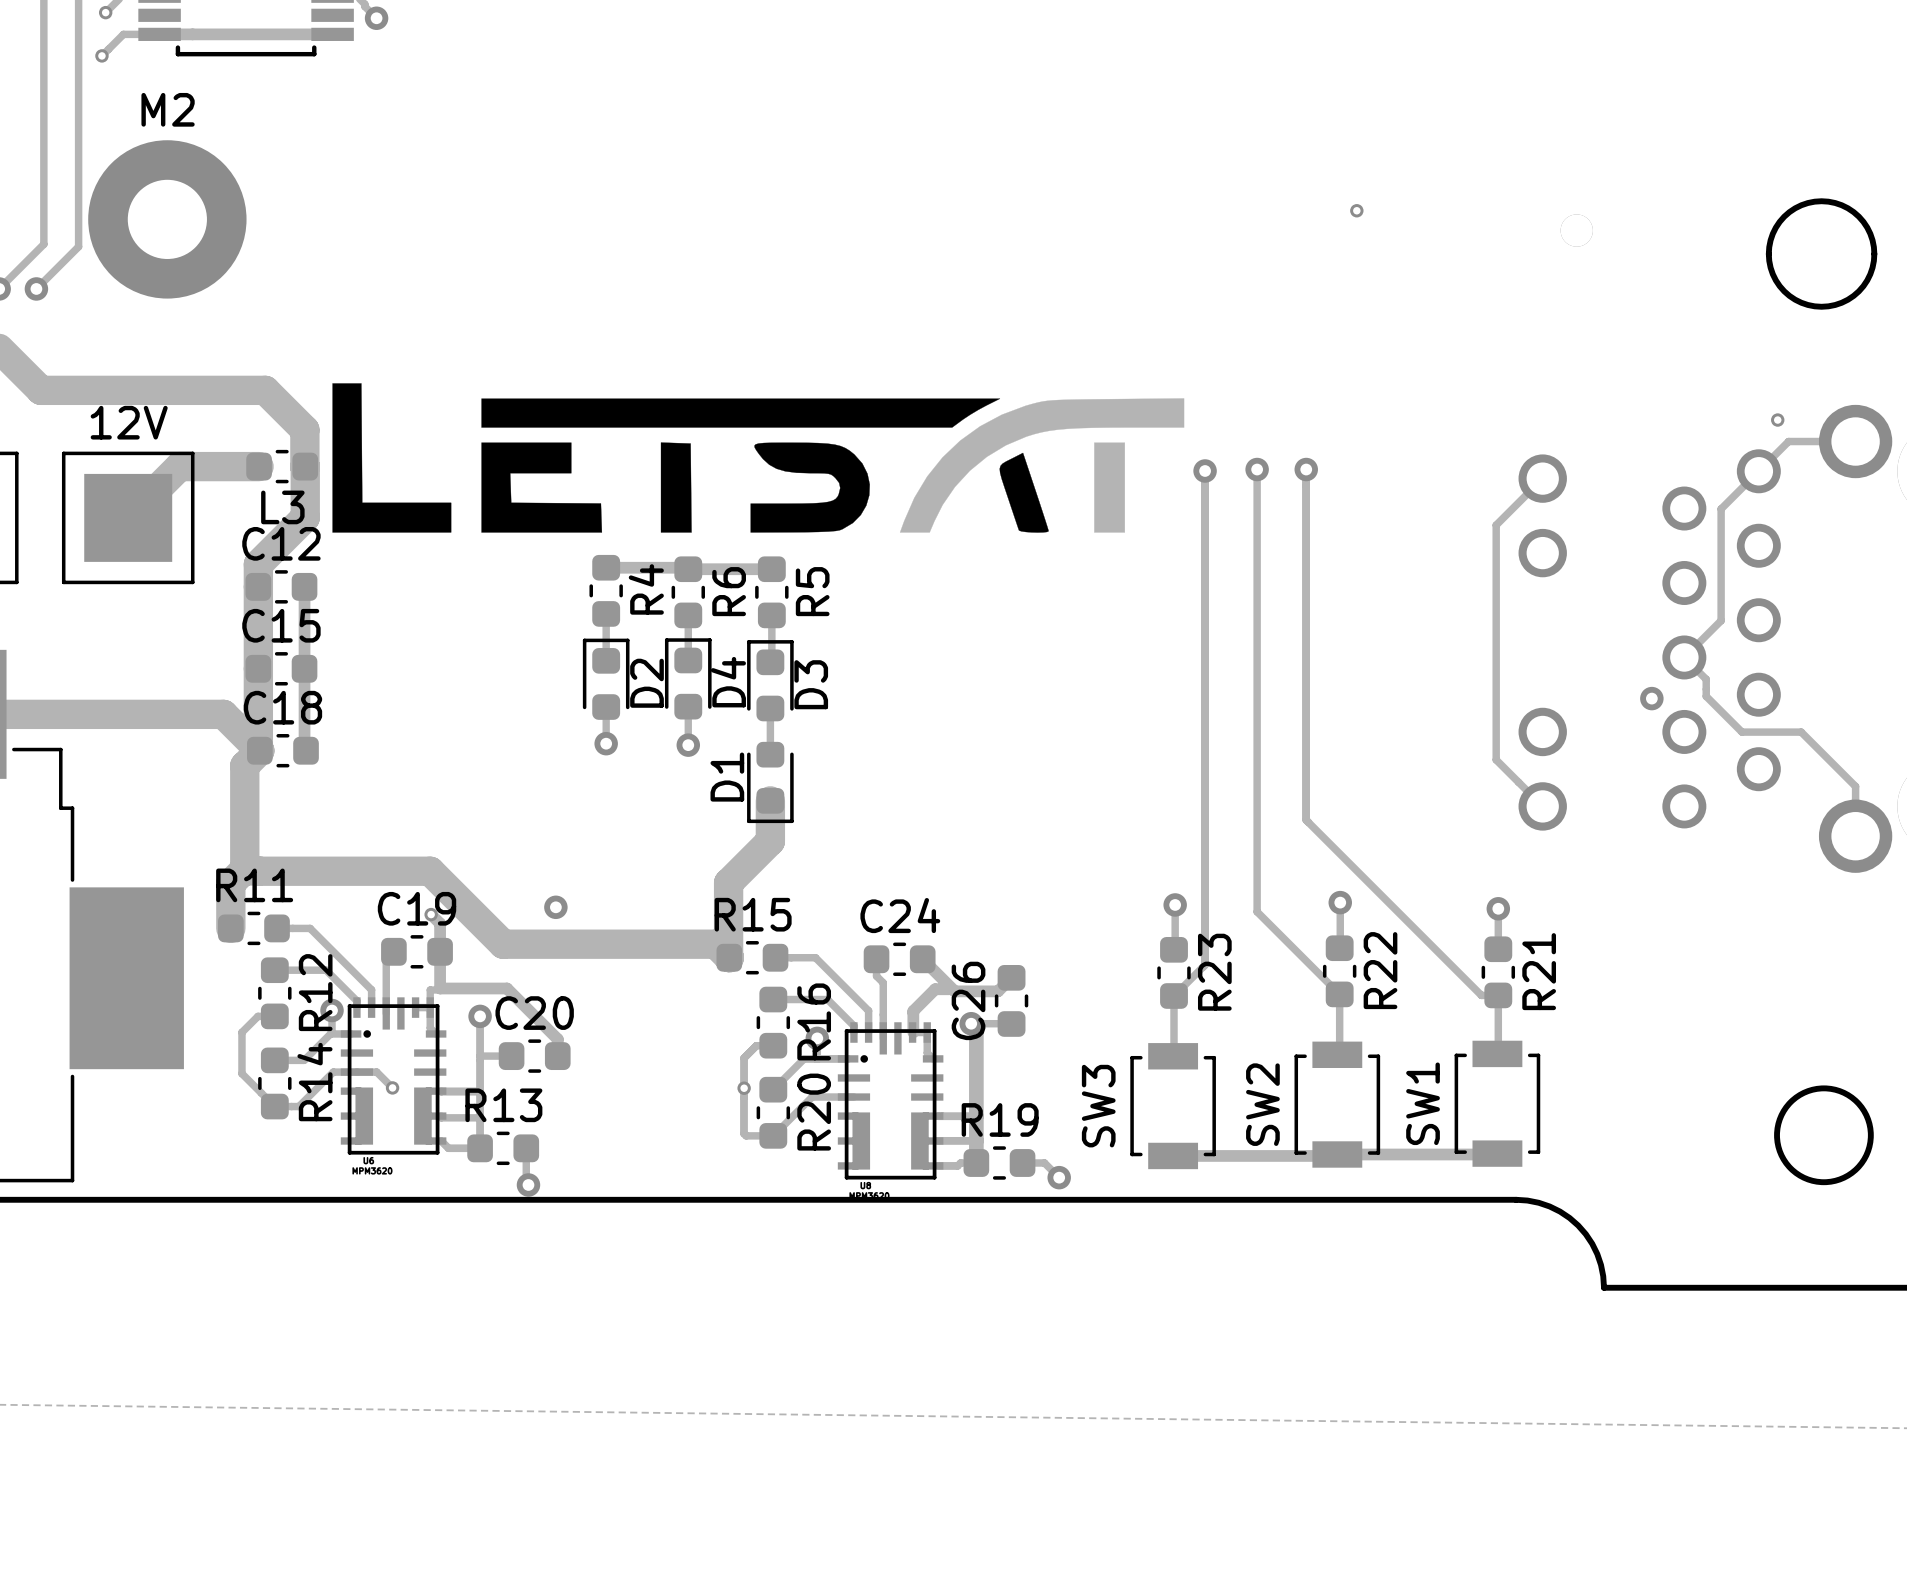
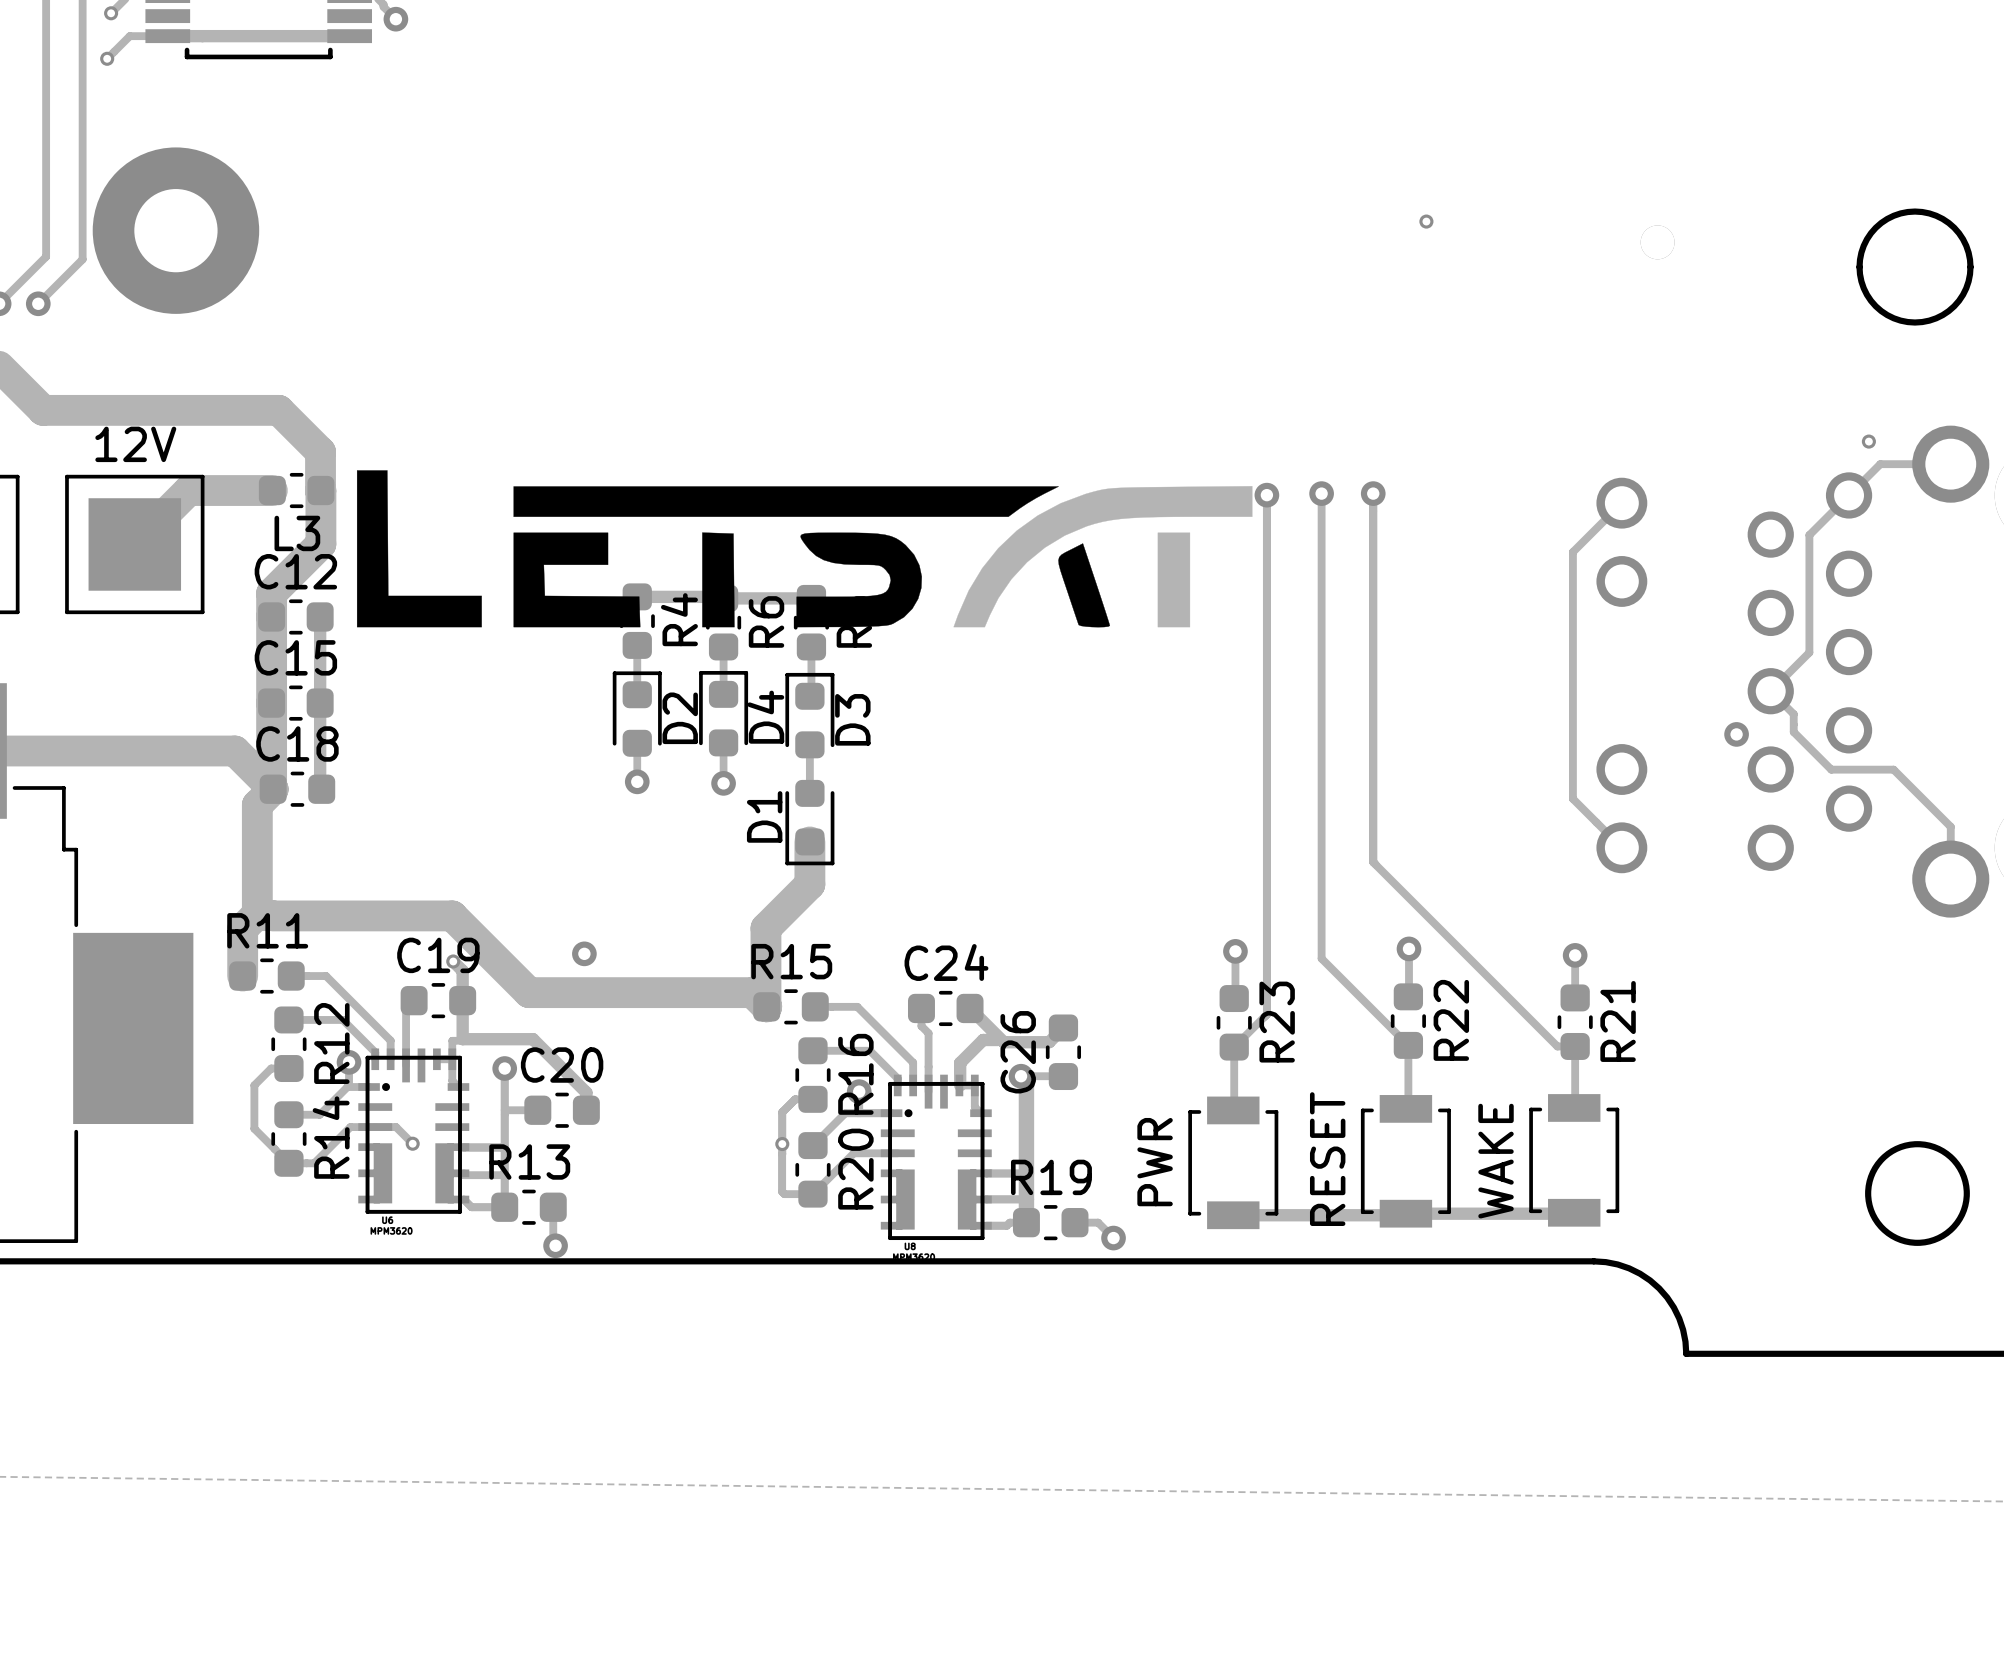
M2 name: M2 (168, 109) -> none
drawing position: (758, 458) -> (804, 548)
SW1 name: SW1 (1423, 1103) -> WAKE (1496, 1161)
SW2 name: SW2 (1262, 1104) -> RESET (1327, 1159)
SW3 name: SW3 (1098, 1106) -> PWR (1155, 1162)

